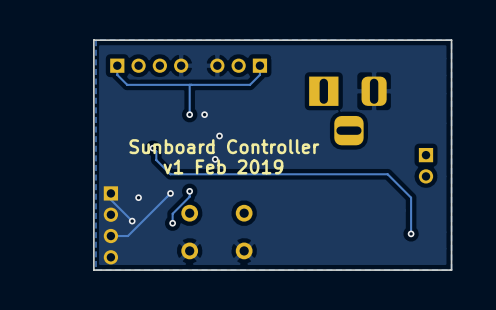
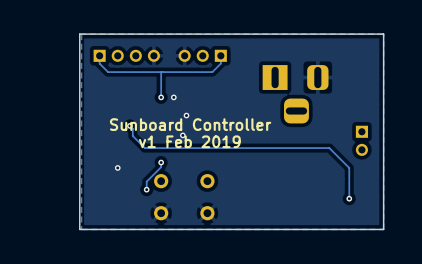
track: (110, 193) (110, 199) (132, 221) -> none
track: (170, 193) (127, 236) (110, 236) -> none
via: (170, 193) -> none
via: (132, 221) -> none
part: (110, 225) -> none

